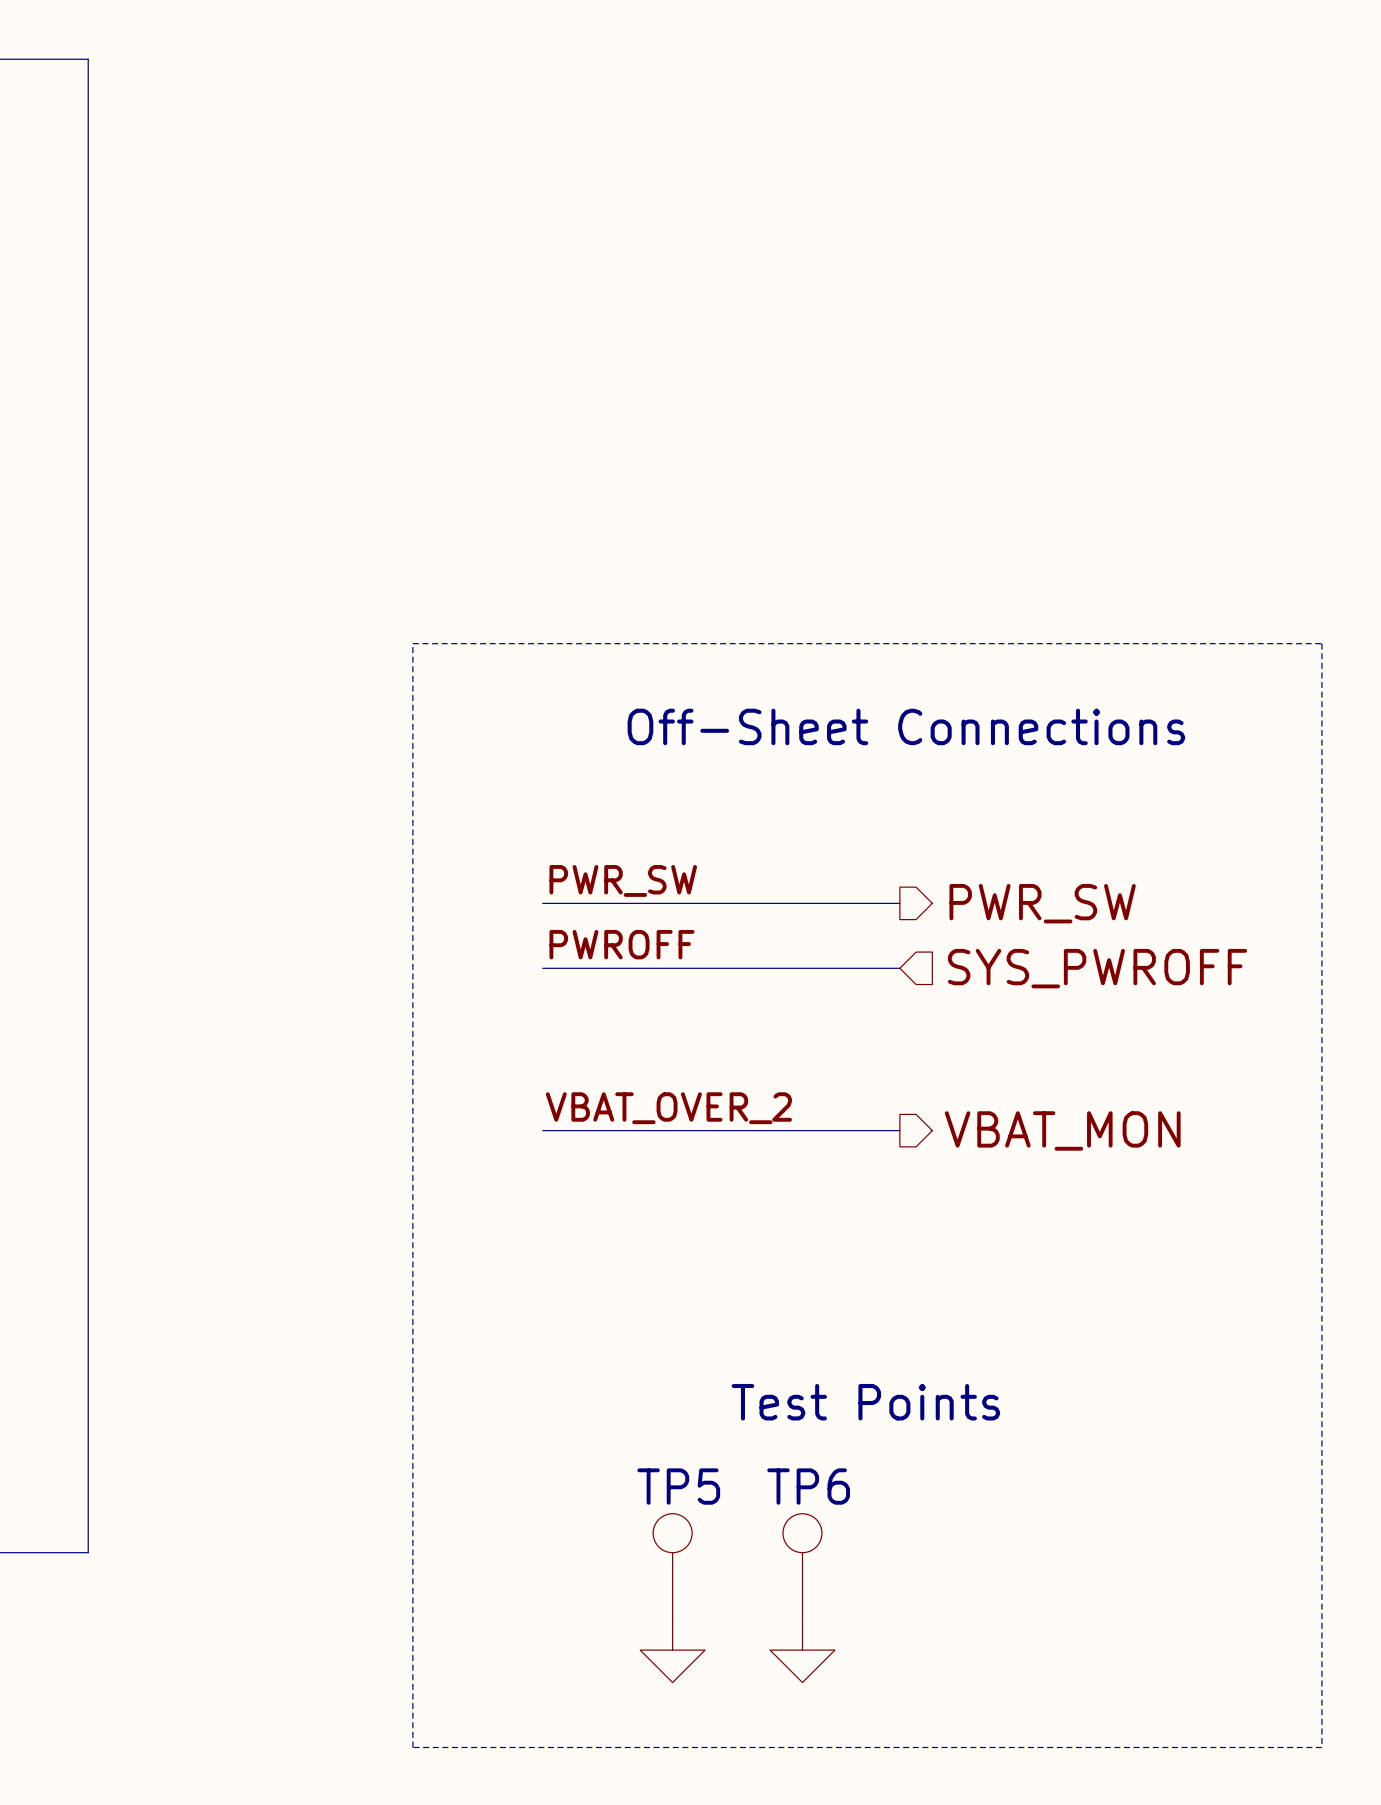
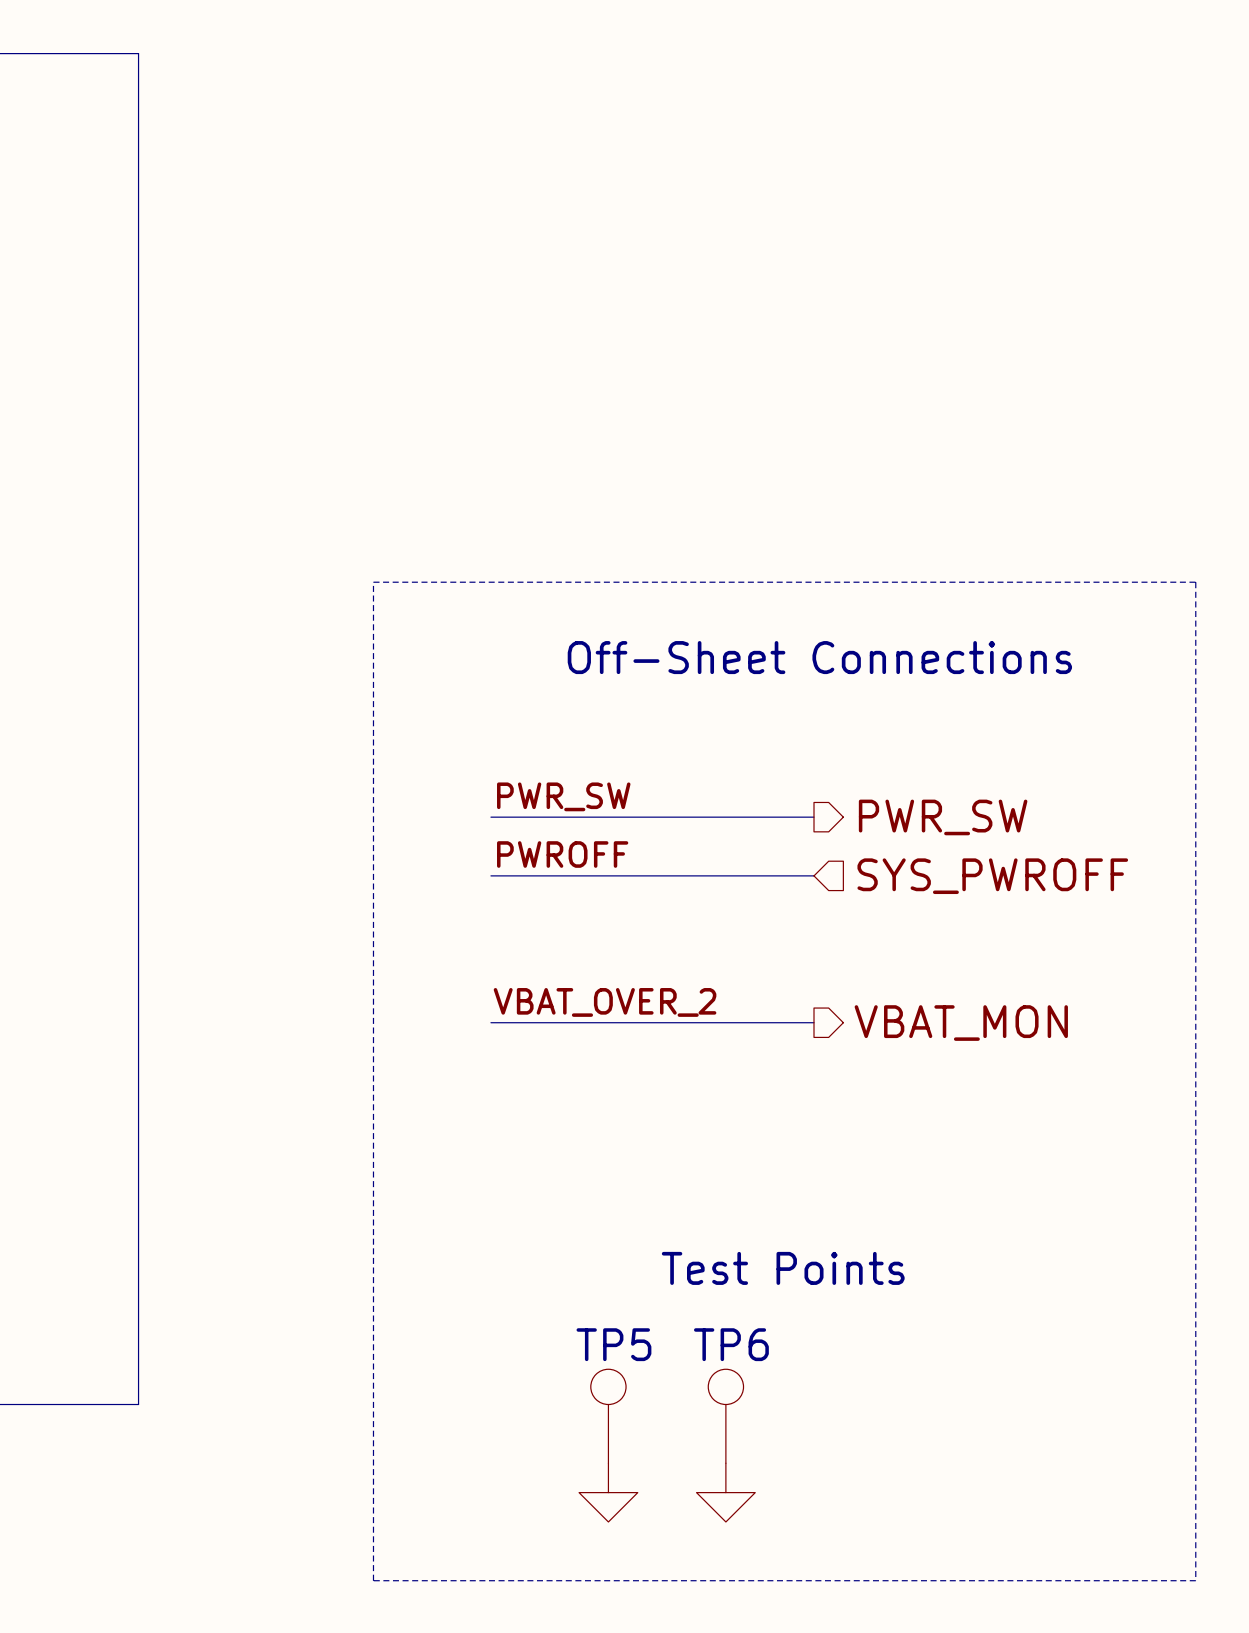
line: (88, 59) (88, 1552) -> (79, 53) (138, 53) (138, 1404) (79, 1404)

